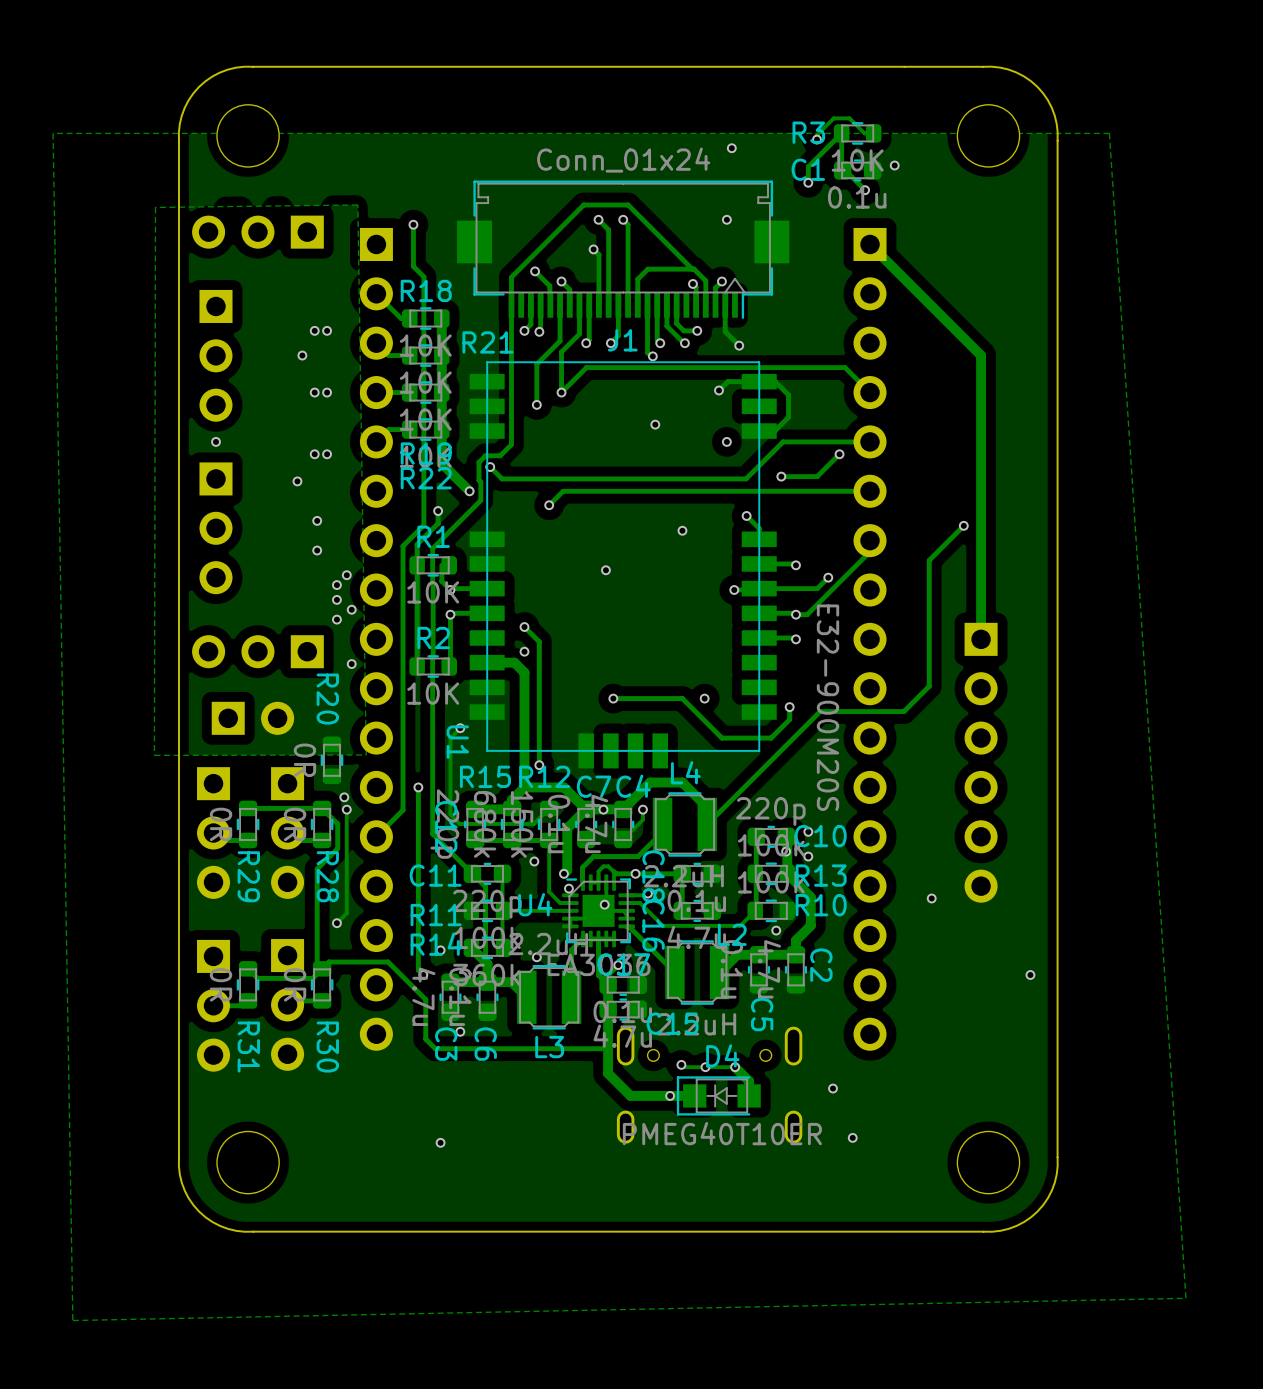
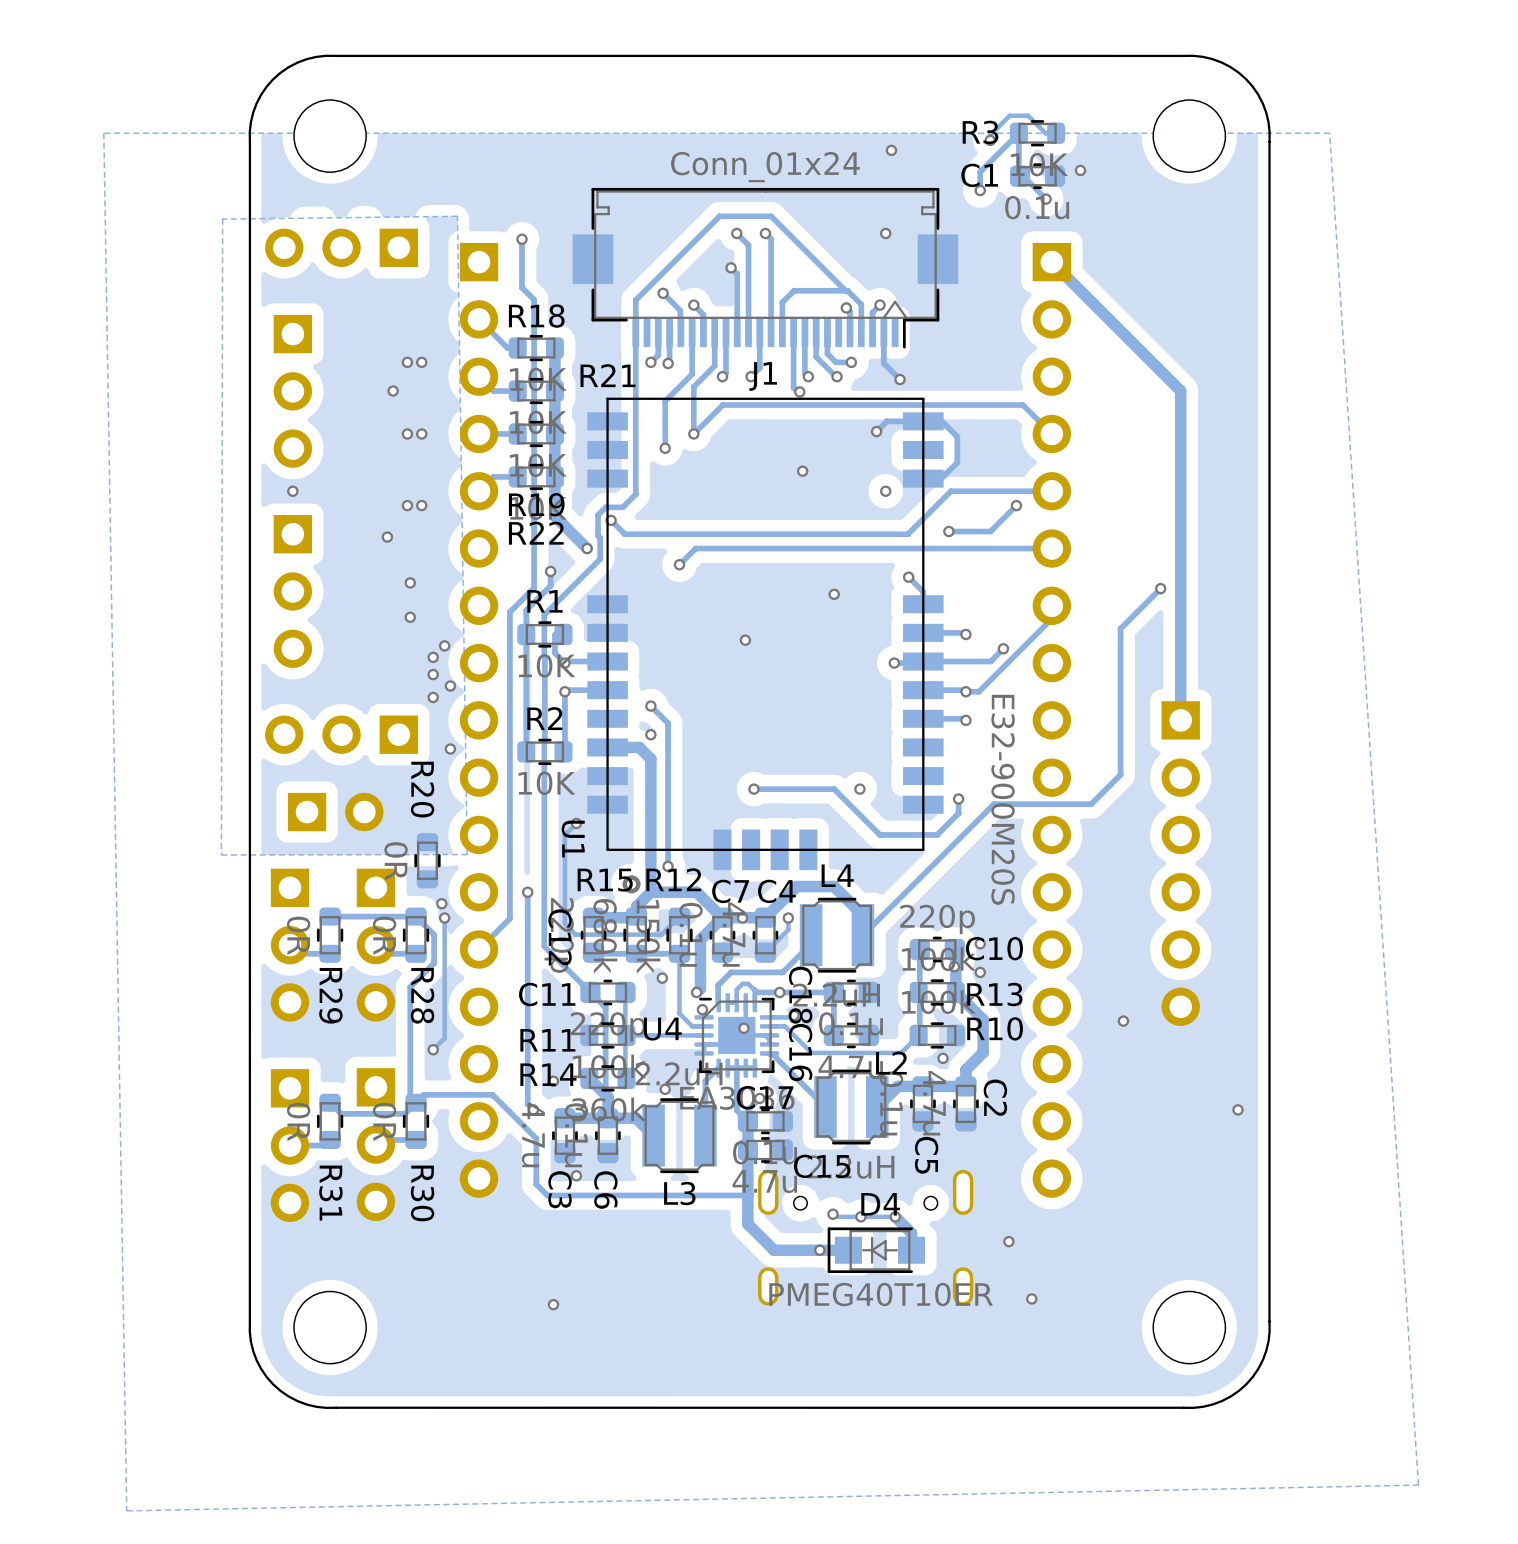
via: none -> (631, 884)

